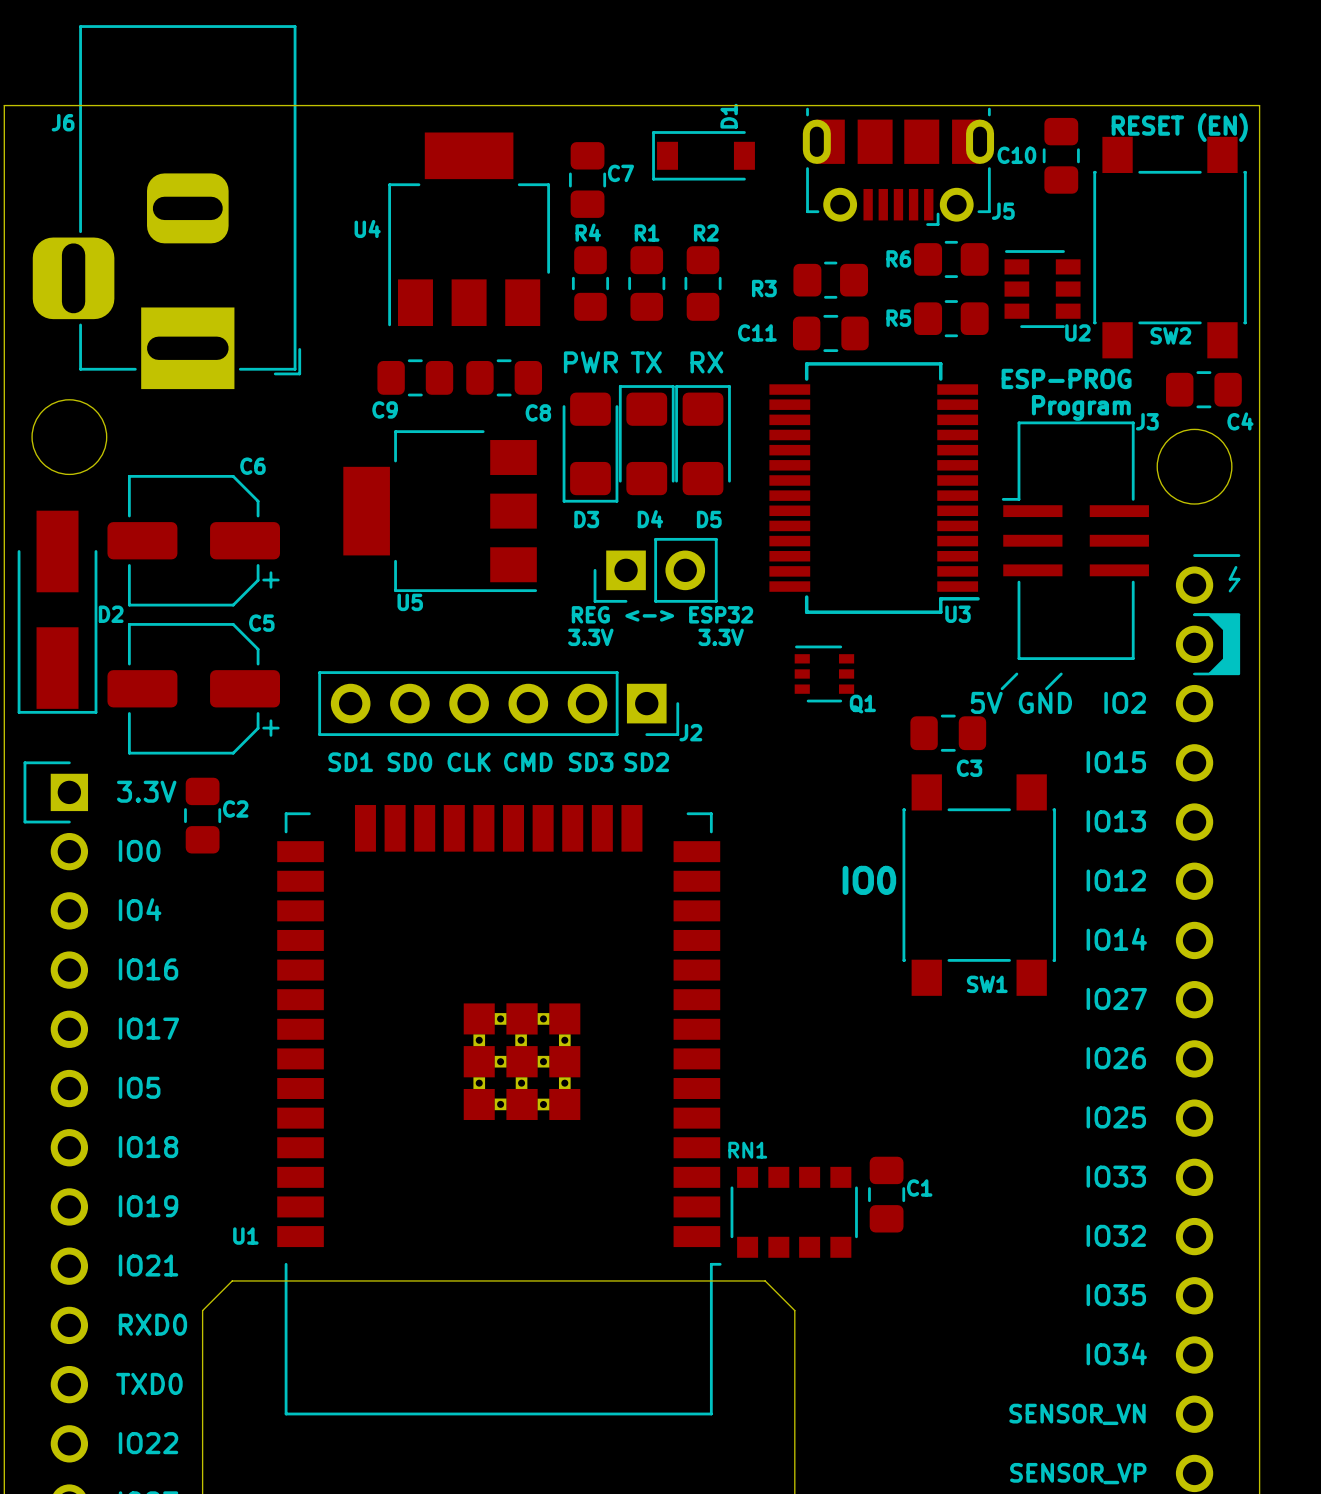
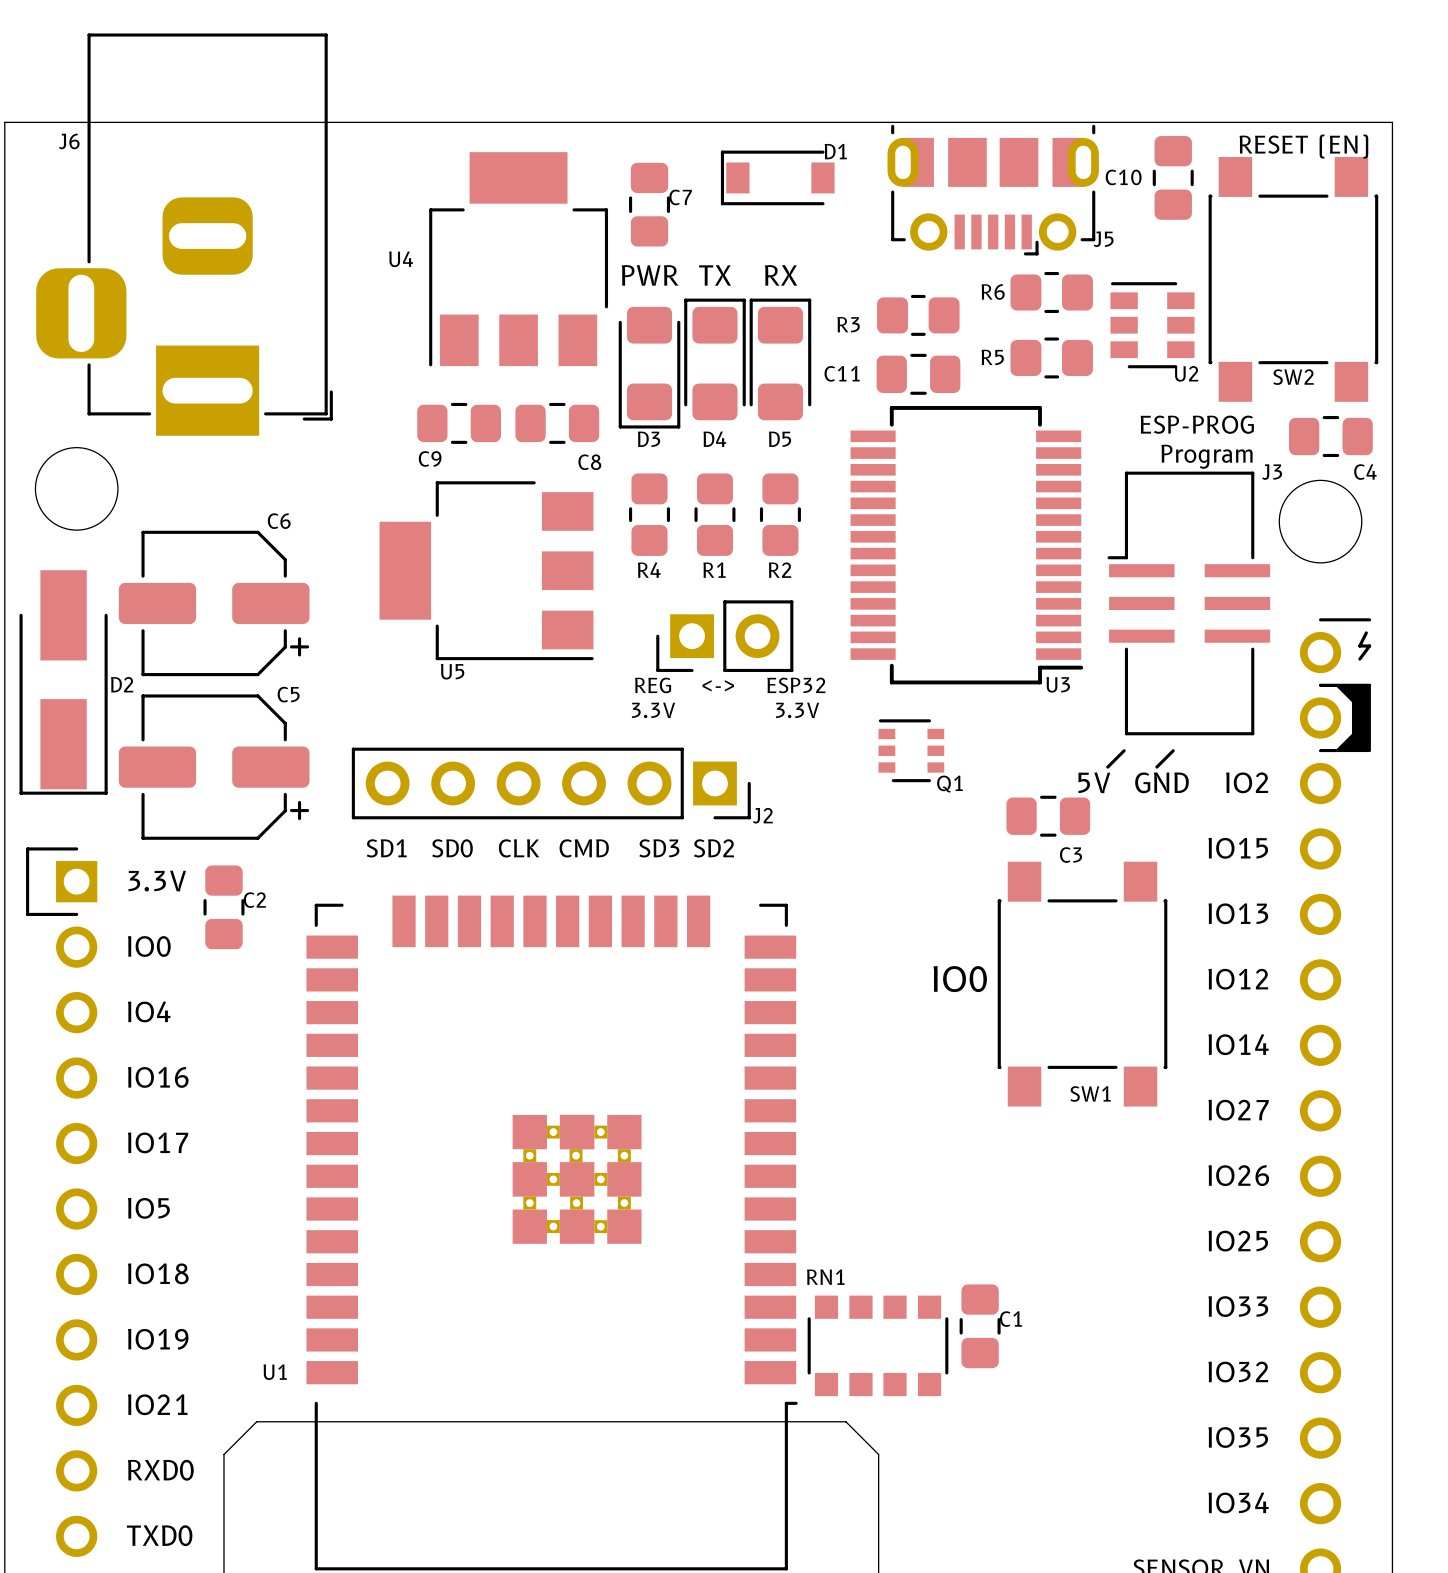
D1 name rotation: 0° (729, 116) -> 90° clockwise (835, 151)
D1 name position: D1 (729, 116) -> D1 (835, 151)
R4 name position: R4 (588, 232) -> R4 (649, 570)
R1 name position: R1 (647, 233) -> R1 (714, 570)
R2 name position: R2 (706, 233) -> R2 (779, 570)
R4 position: (590, 283) -> (649, 514)
R1 position: (646, 283) -> (714, 514)
R2 position: (703, 283) -> (780, 514)
text position: PWR (590, 362) -> PWR (650, 275)
text position: TX (646, 362) -> TX (715, 275)
text position: RX (706, 362) -> RX (781, 275)
D4 position: (646, 440) -> (714, 359)
D5 position: (703, 440) -> (780, 359)
D3 position: (590, 447) -> (649, 367)
D3 name position: D3 (586, 519) -> D3 (649, 439)
D4 name position: D4 (650, 519) -> D4 (714, 439)
D5 name position: D5 (709, 519) -> D5 (780, 439)

